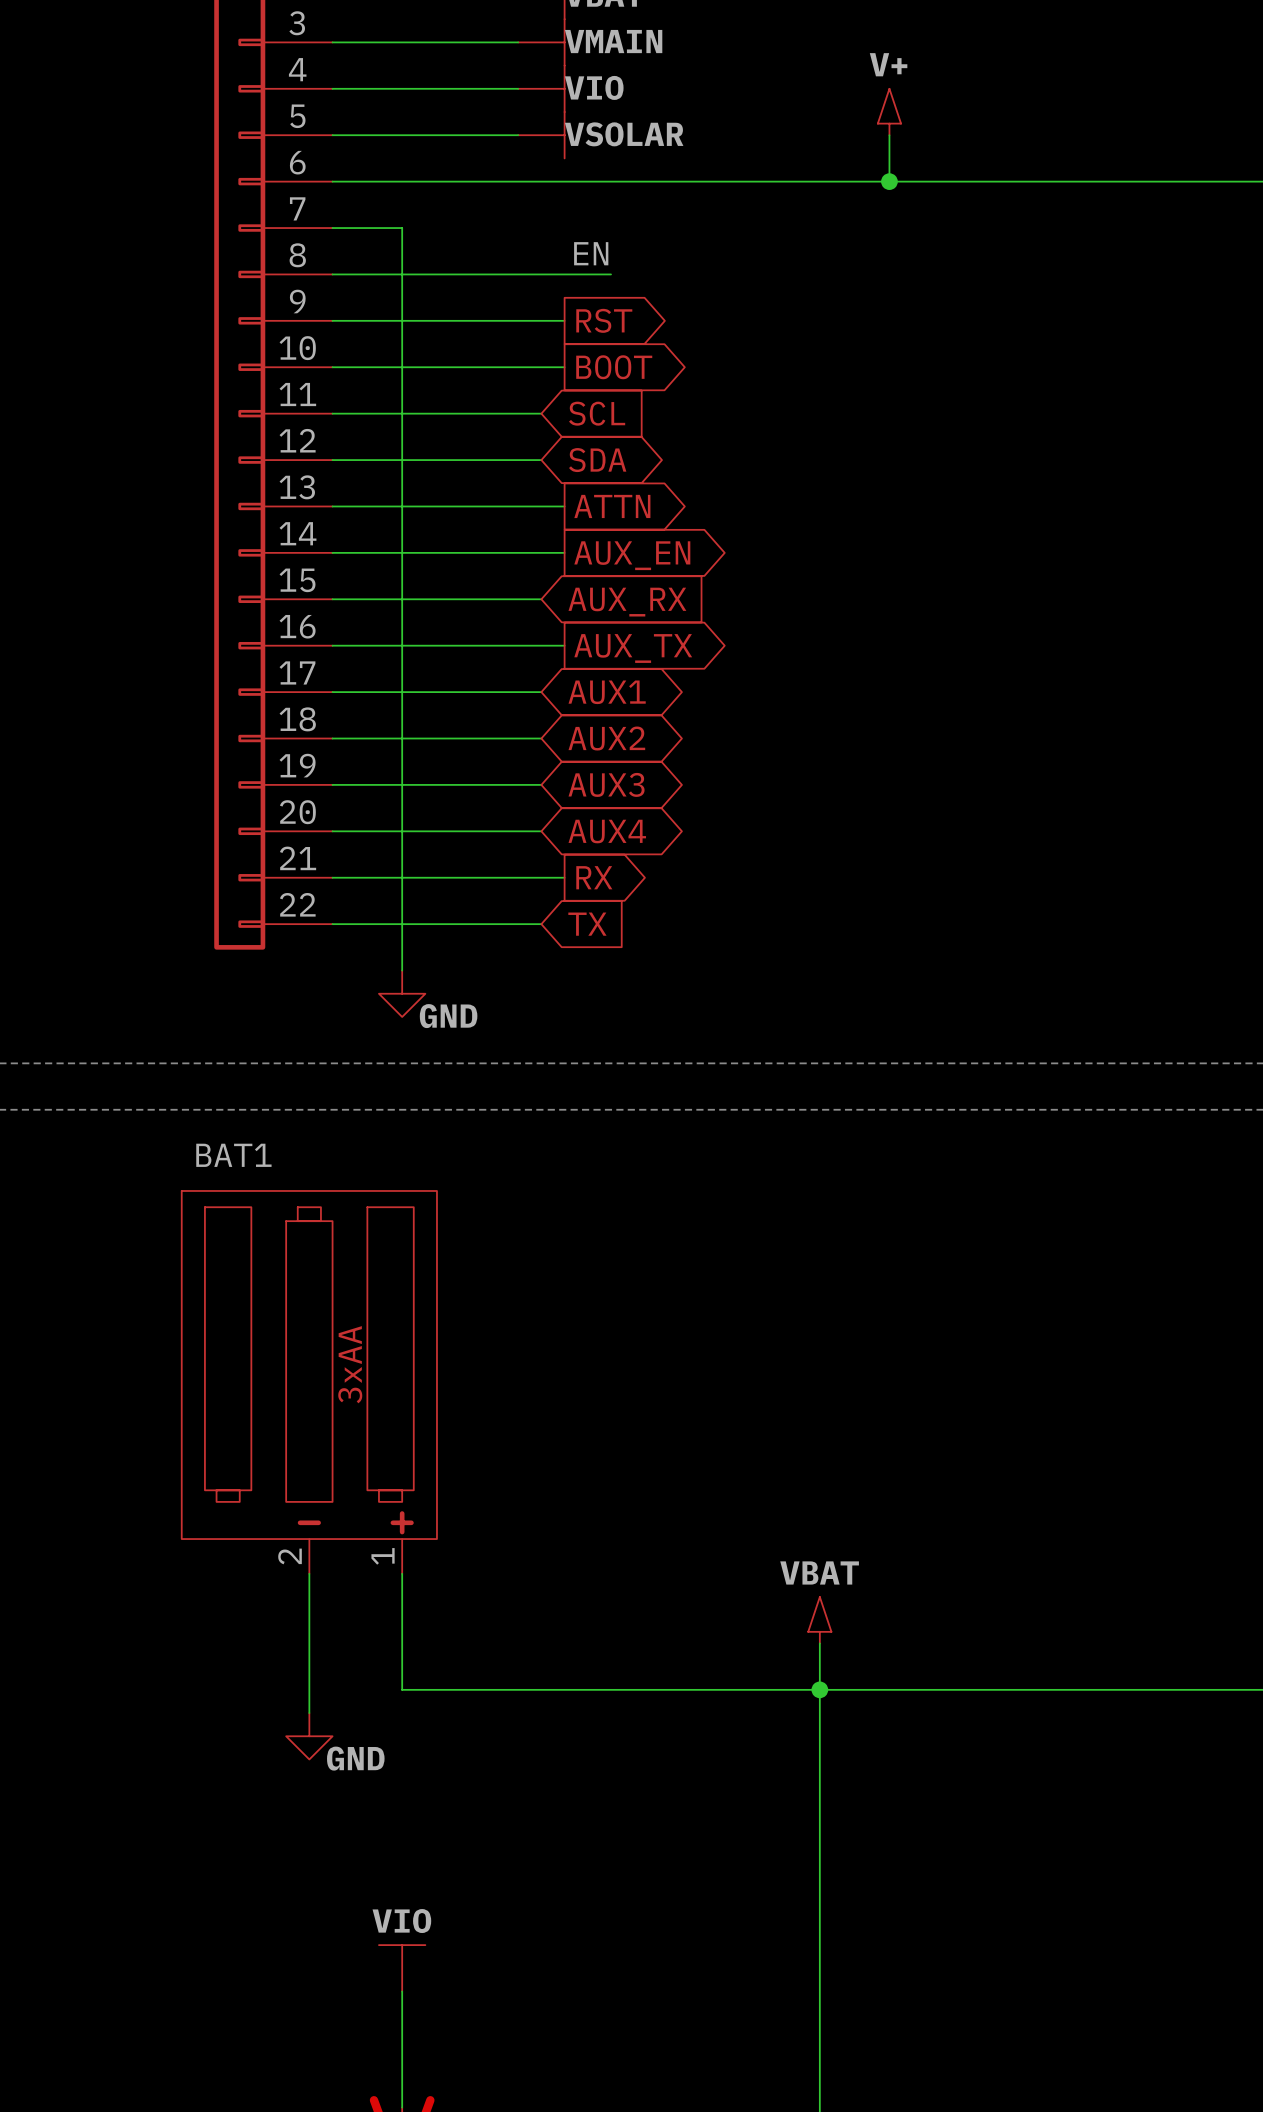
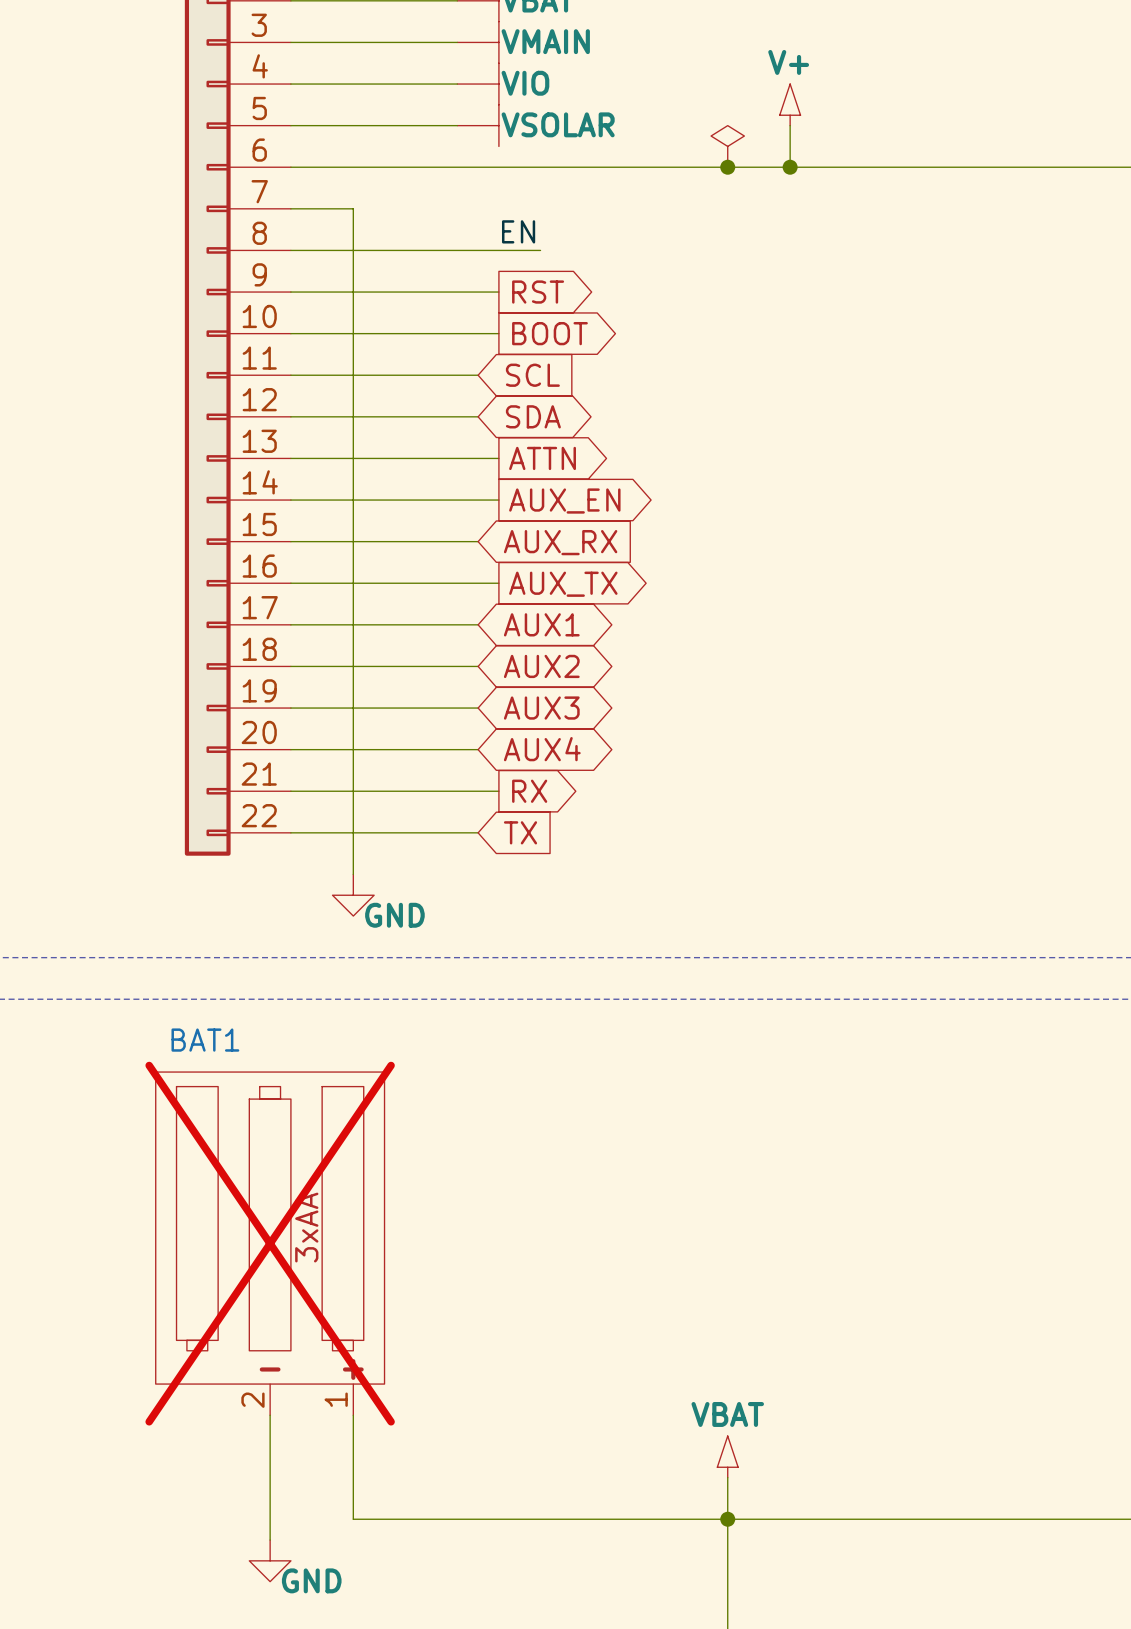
power symbol: none -> (727, 146)
junction: none -> (727, 167)
BAT1 do-not-place cross: none -> (270, 1243)

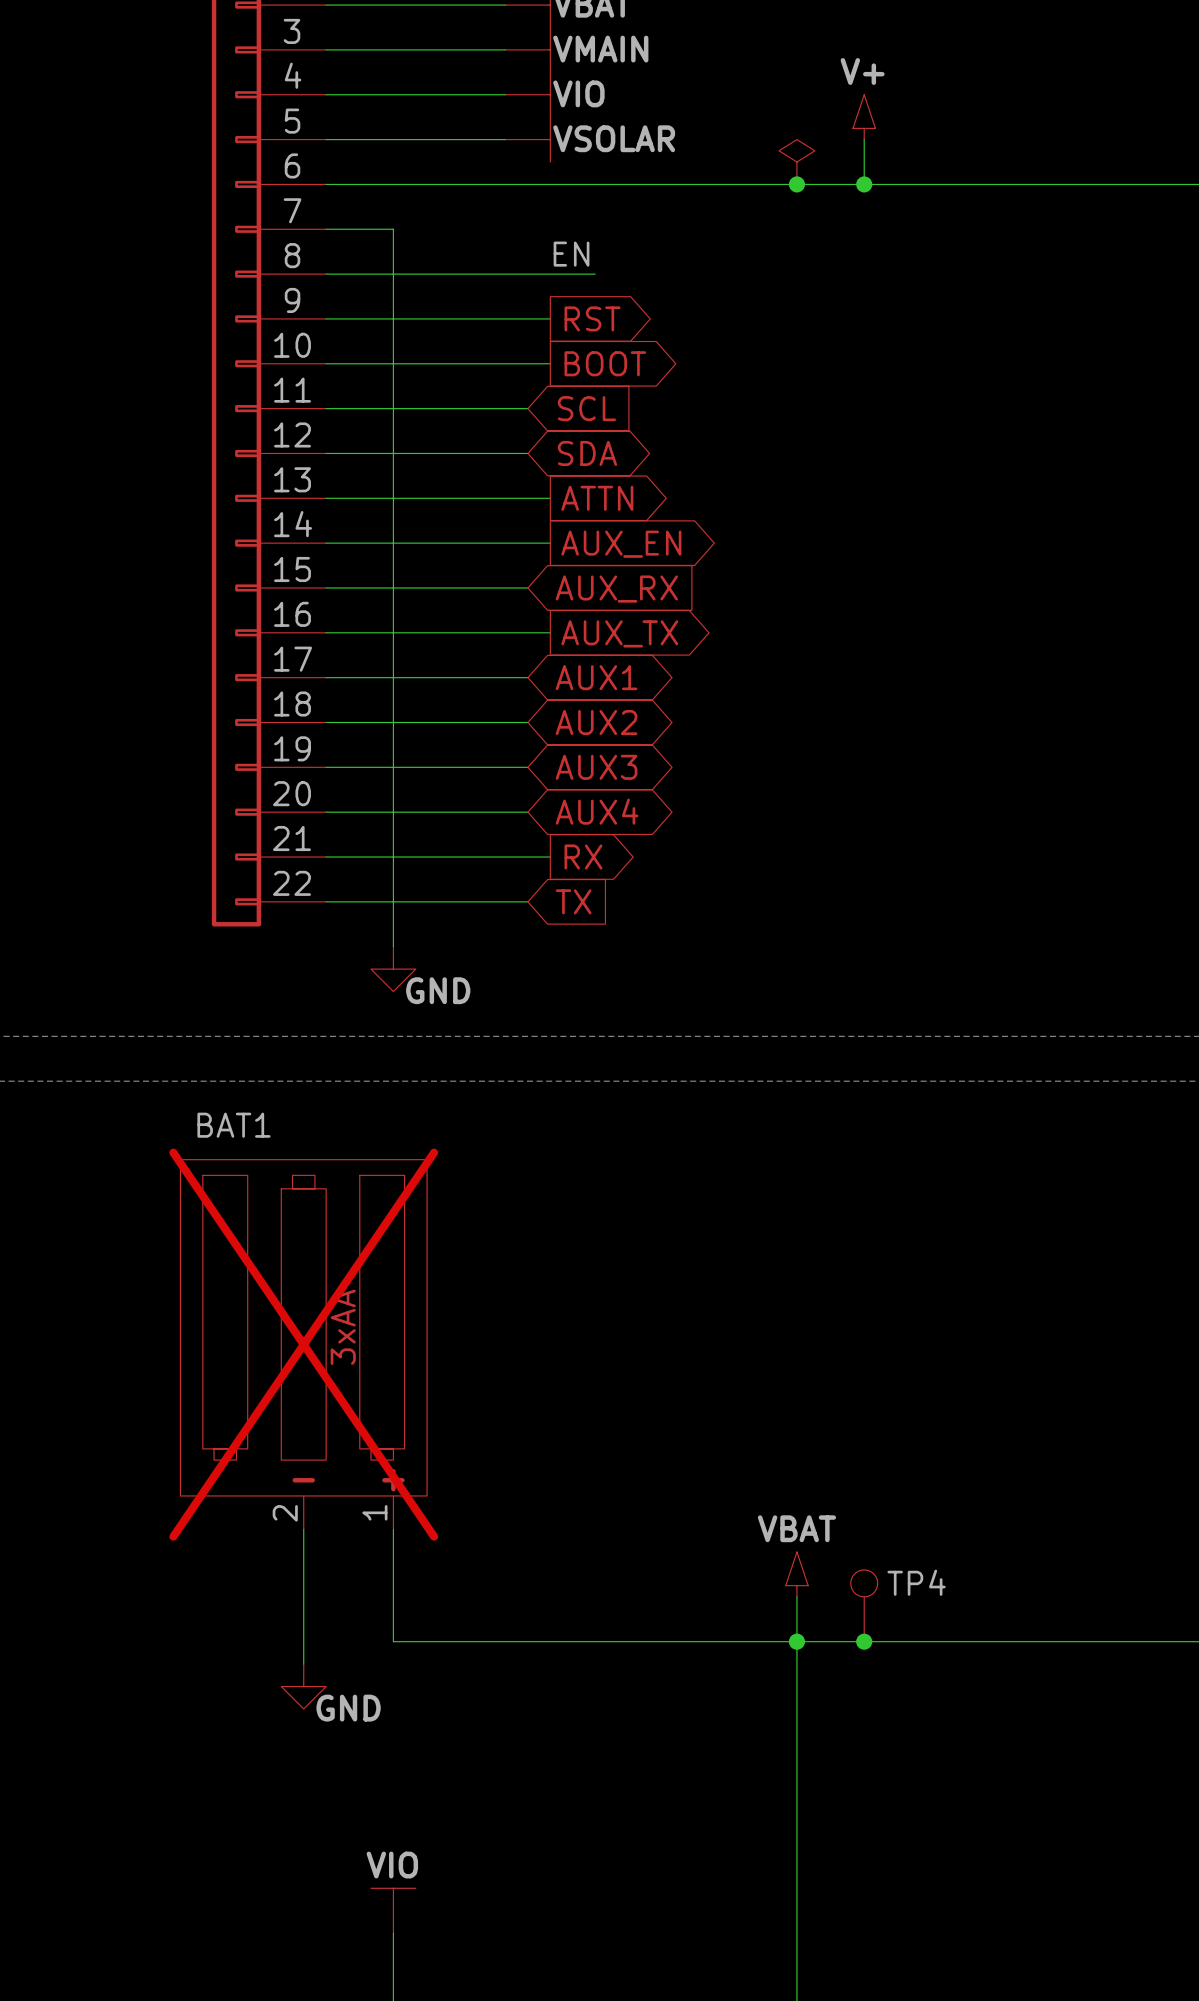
TP4: none -> (864, 1605)
junction: none -> (864, 1641)

